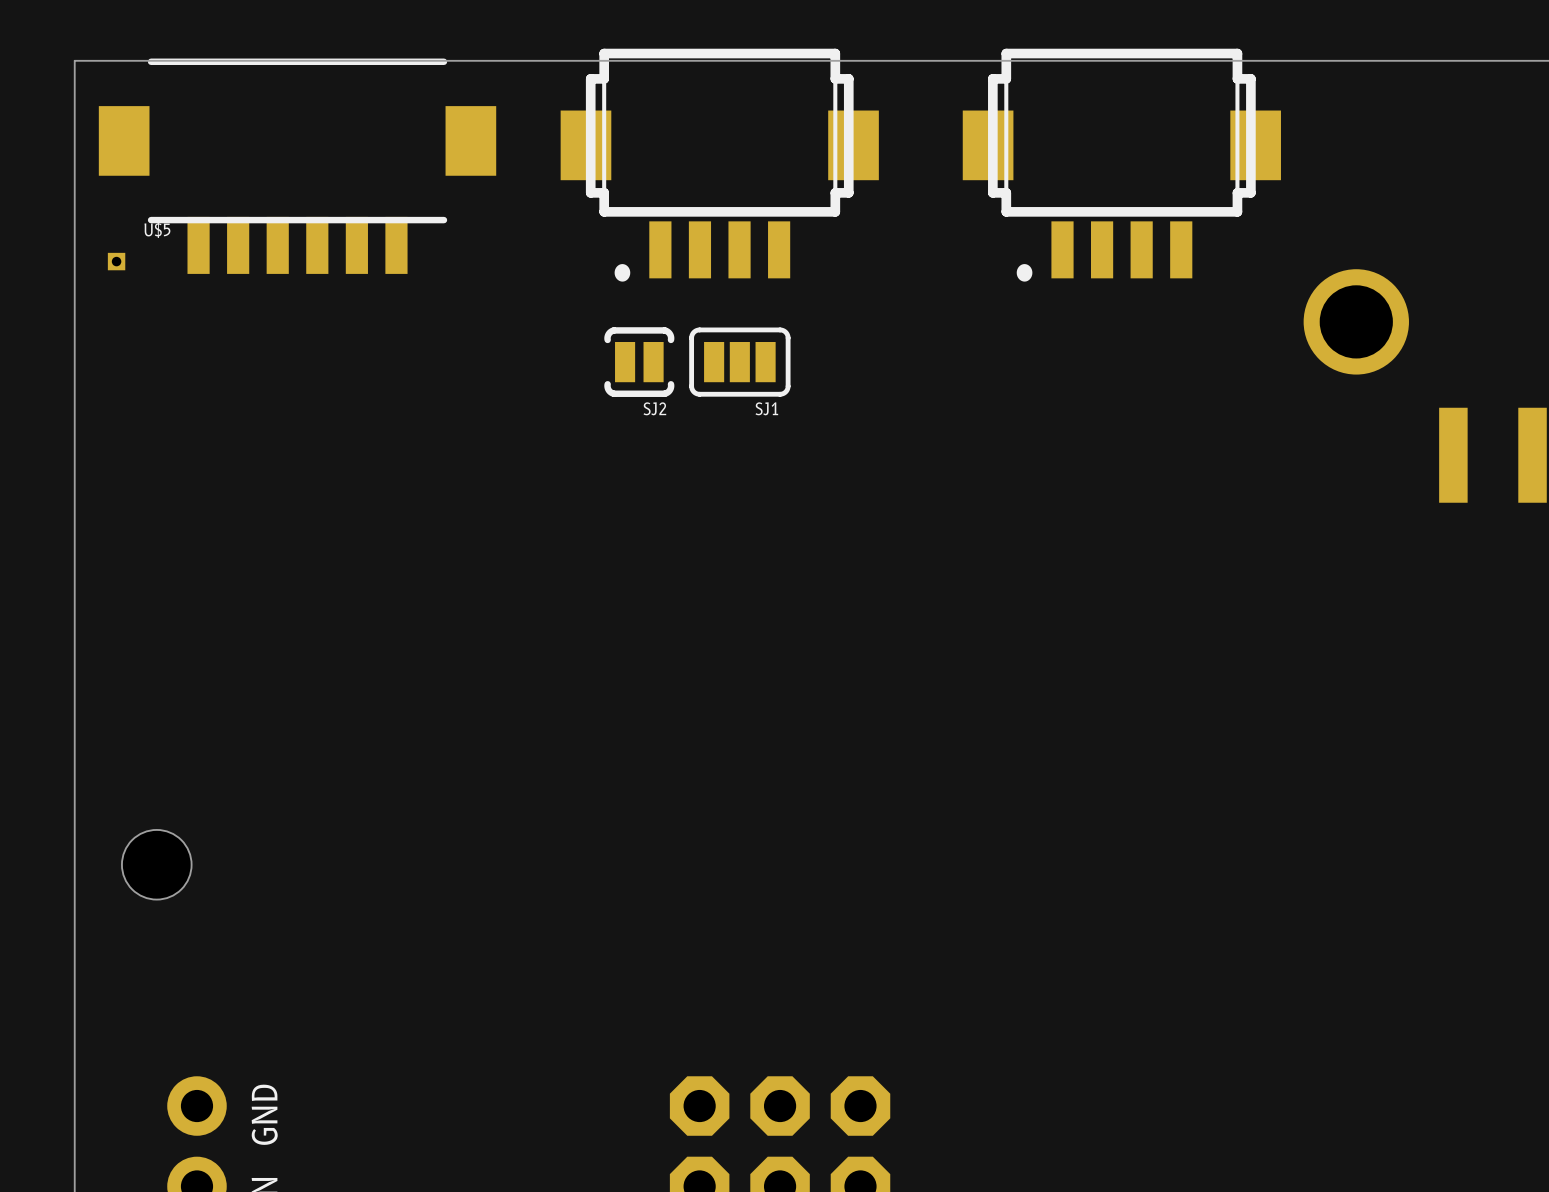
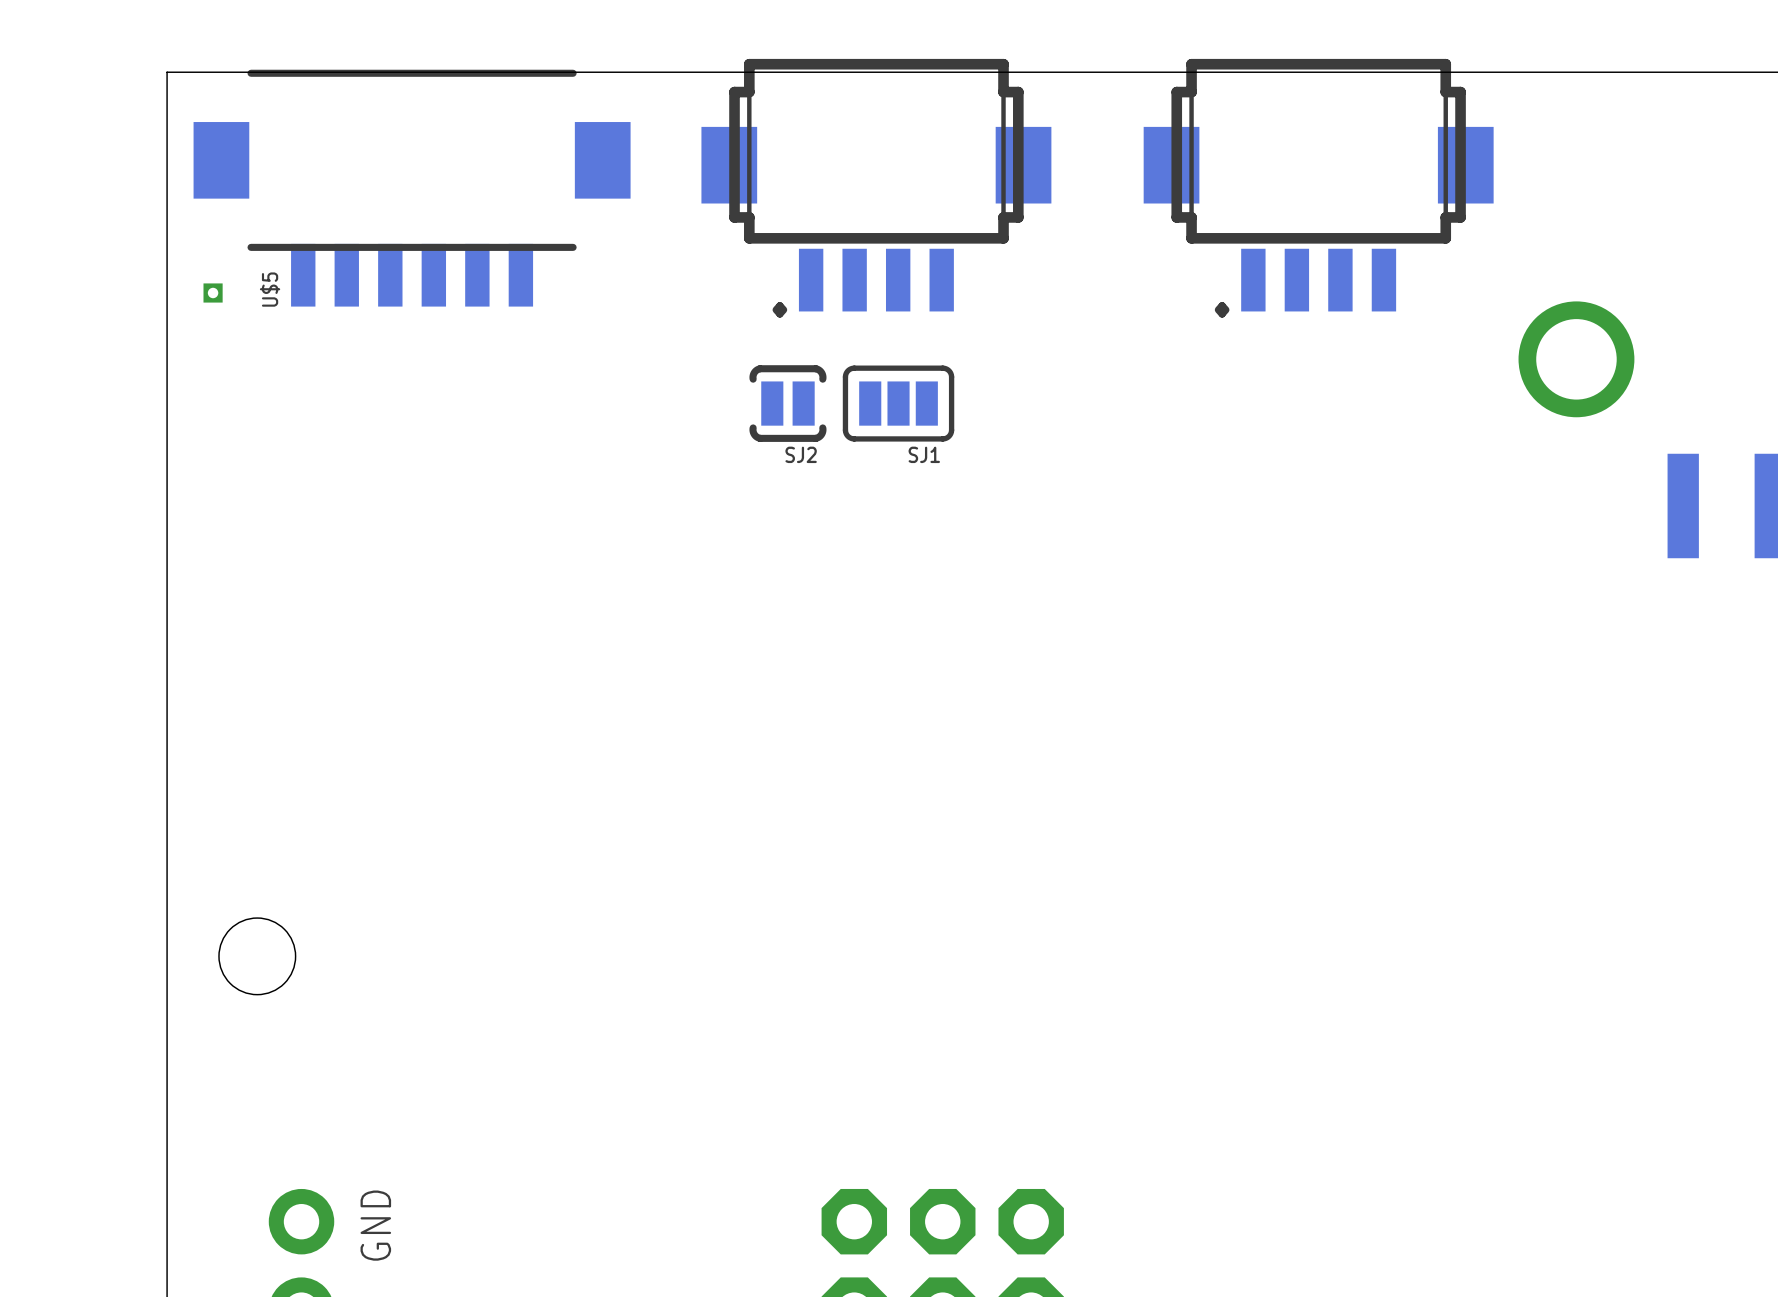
U$5 name rotation: 0° (157, 229) -> 90° counterclockwise (270, 289)

